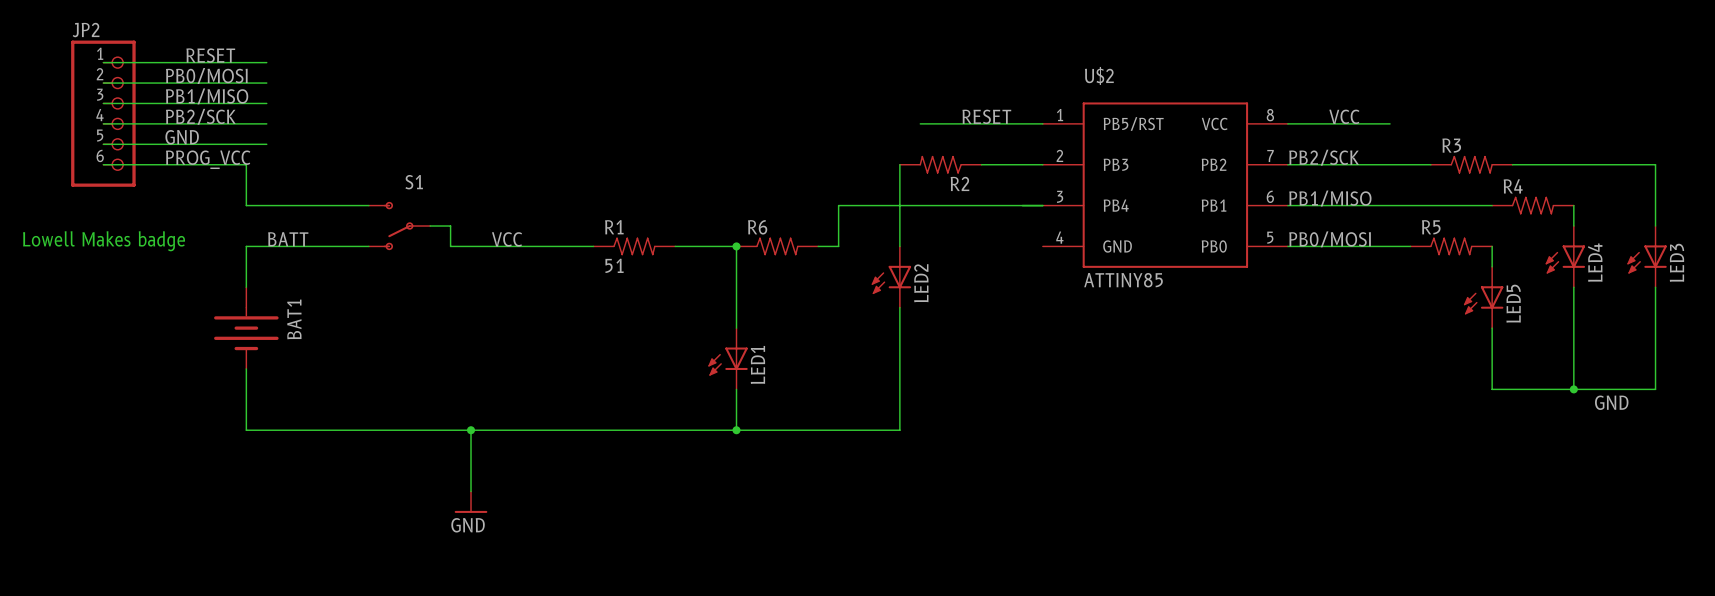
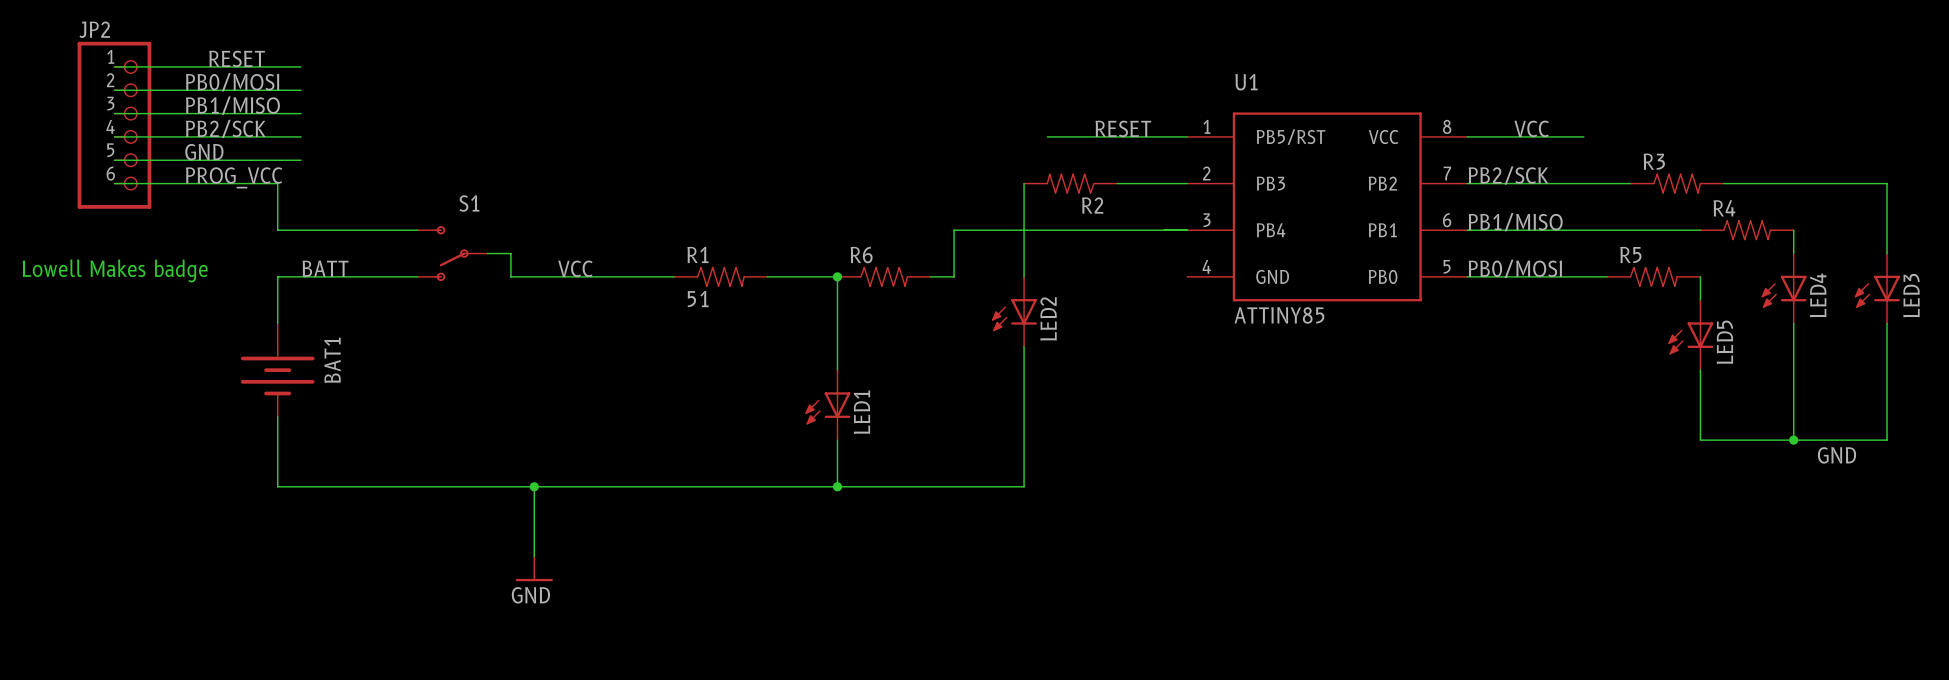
U$2 name: U$2 (1099, 75) -> U1 (1246, 82)

